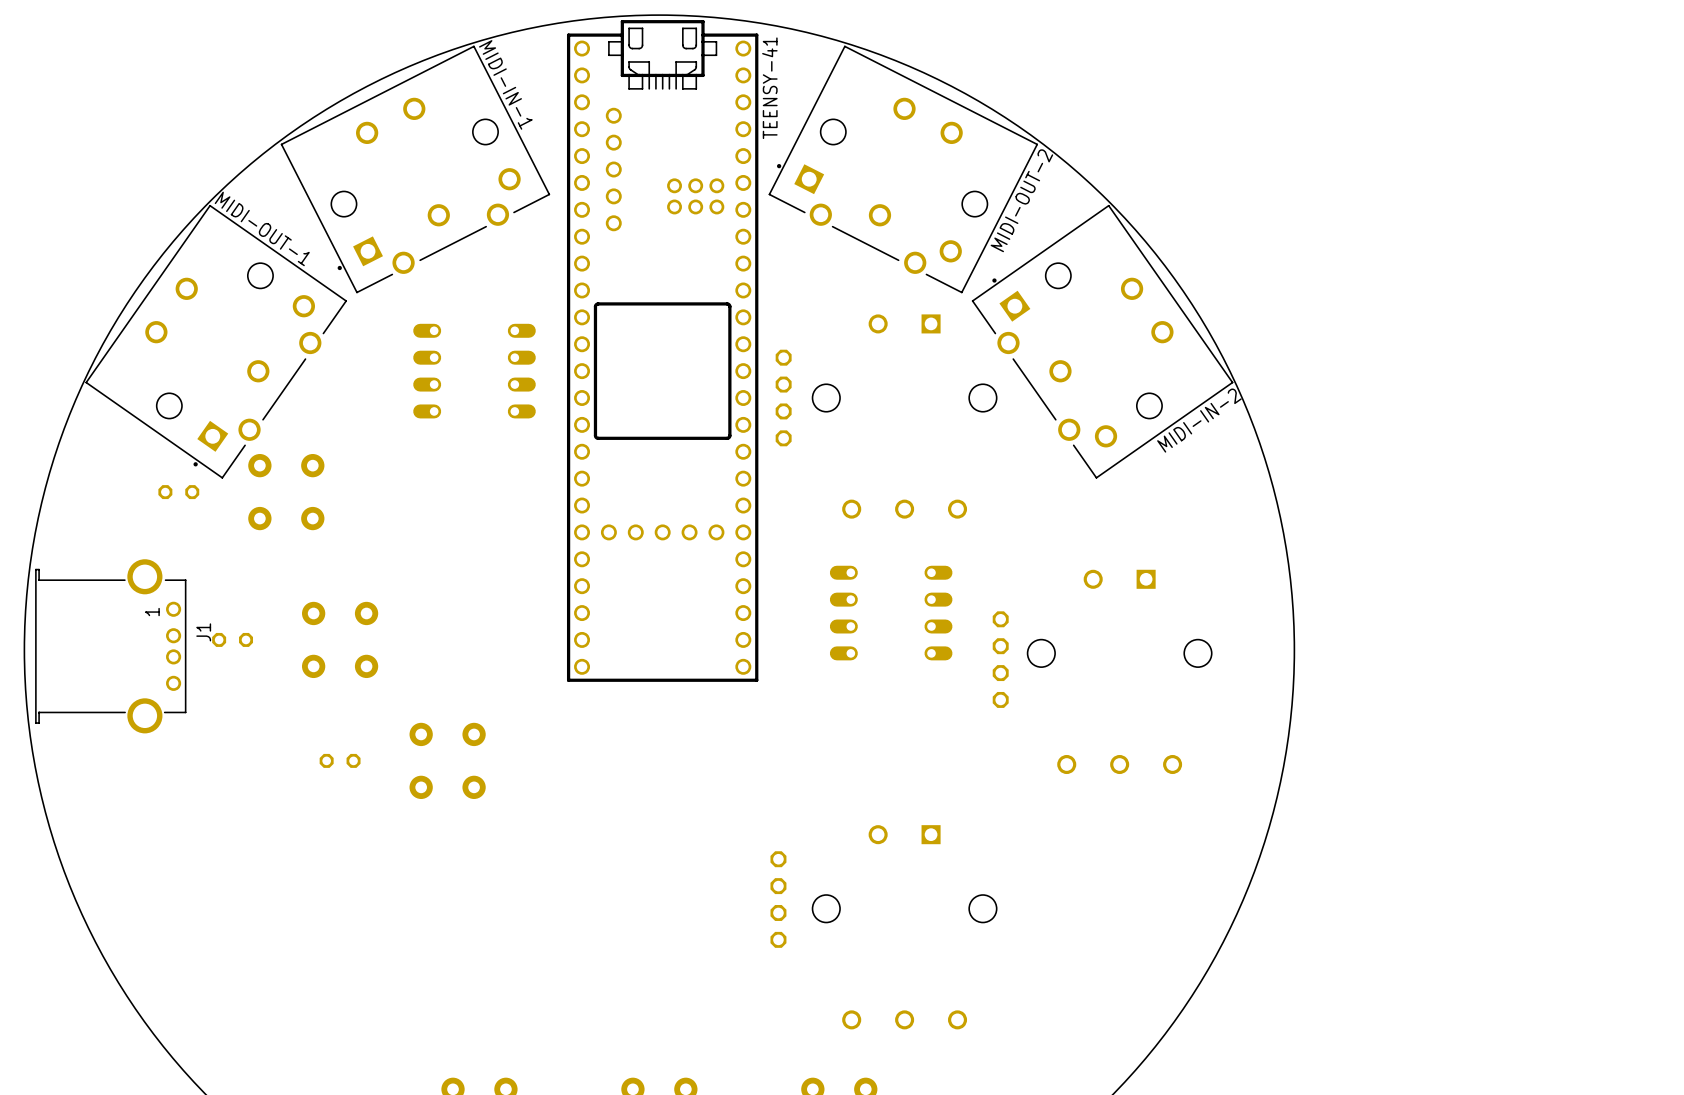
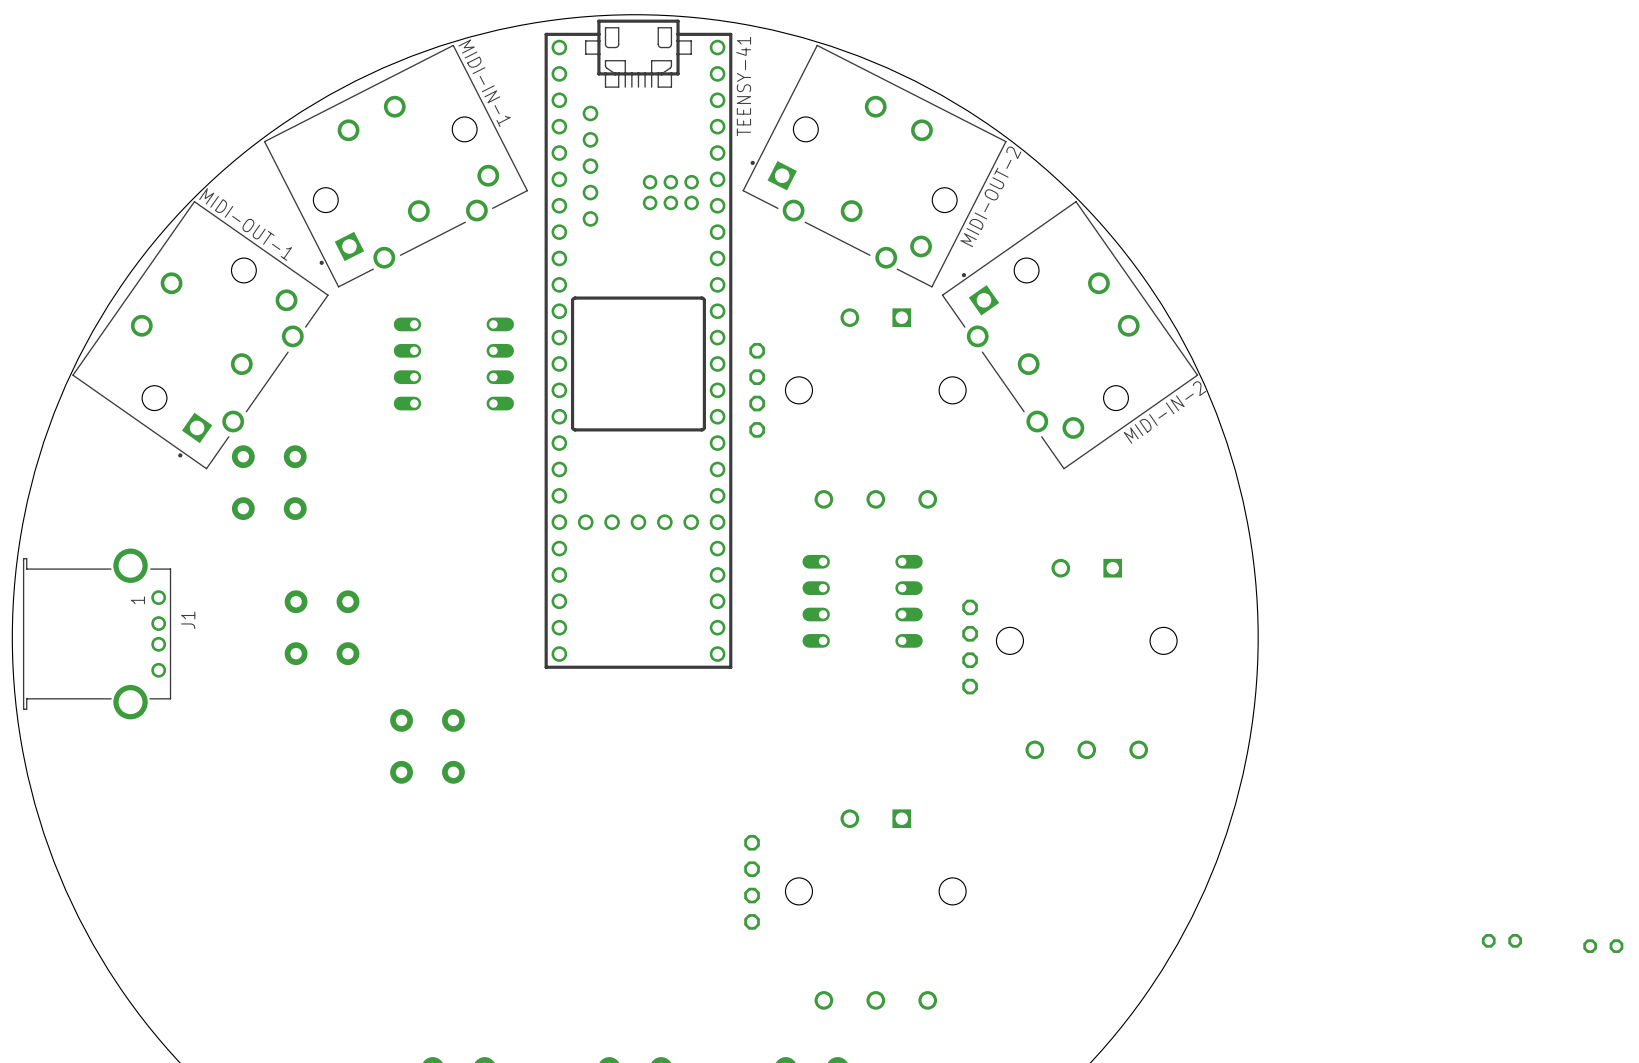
part: (178, 492) -> none
part: (232, 639) -> none
part: (340, 760) -> none
part: none -> (1501, 940)
part: none -> (1603, 946)

